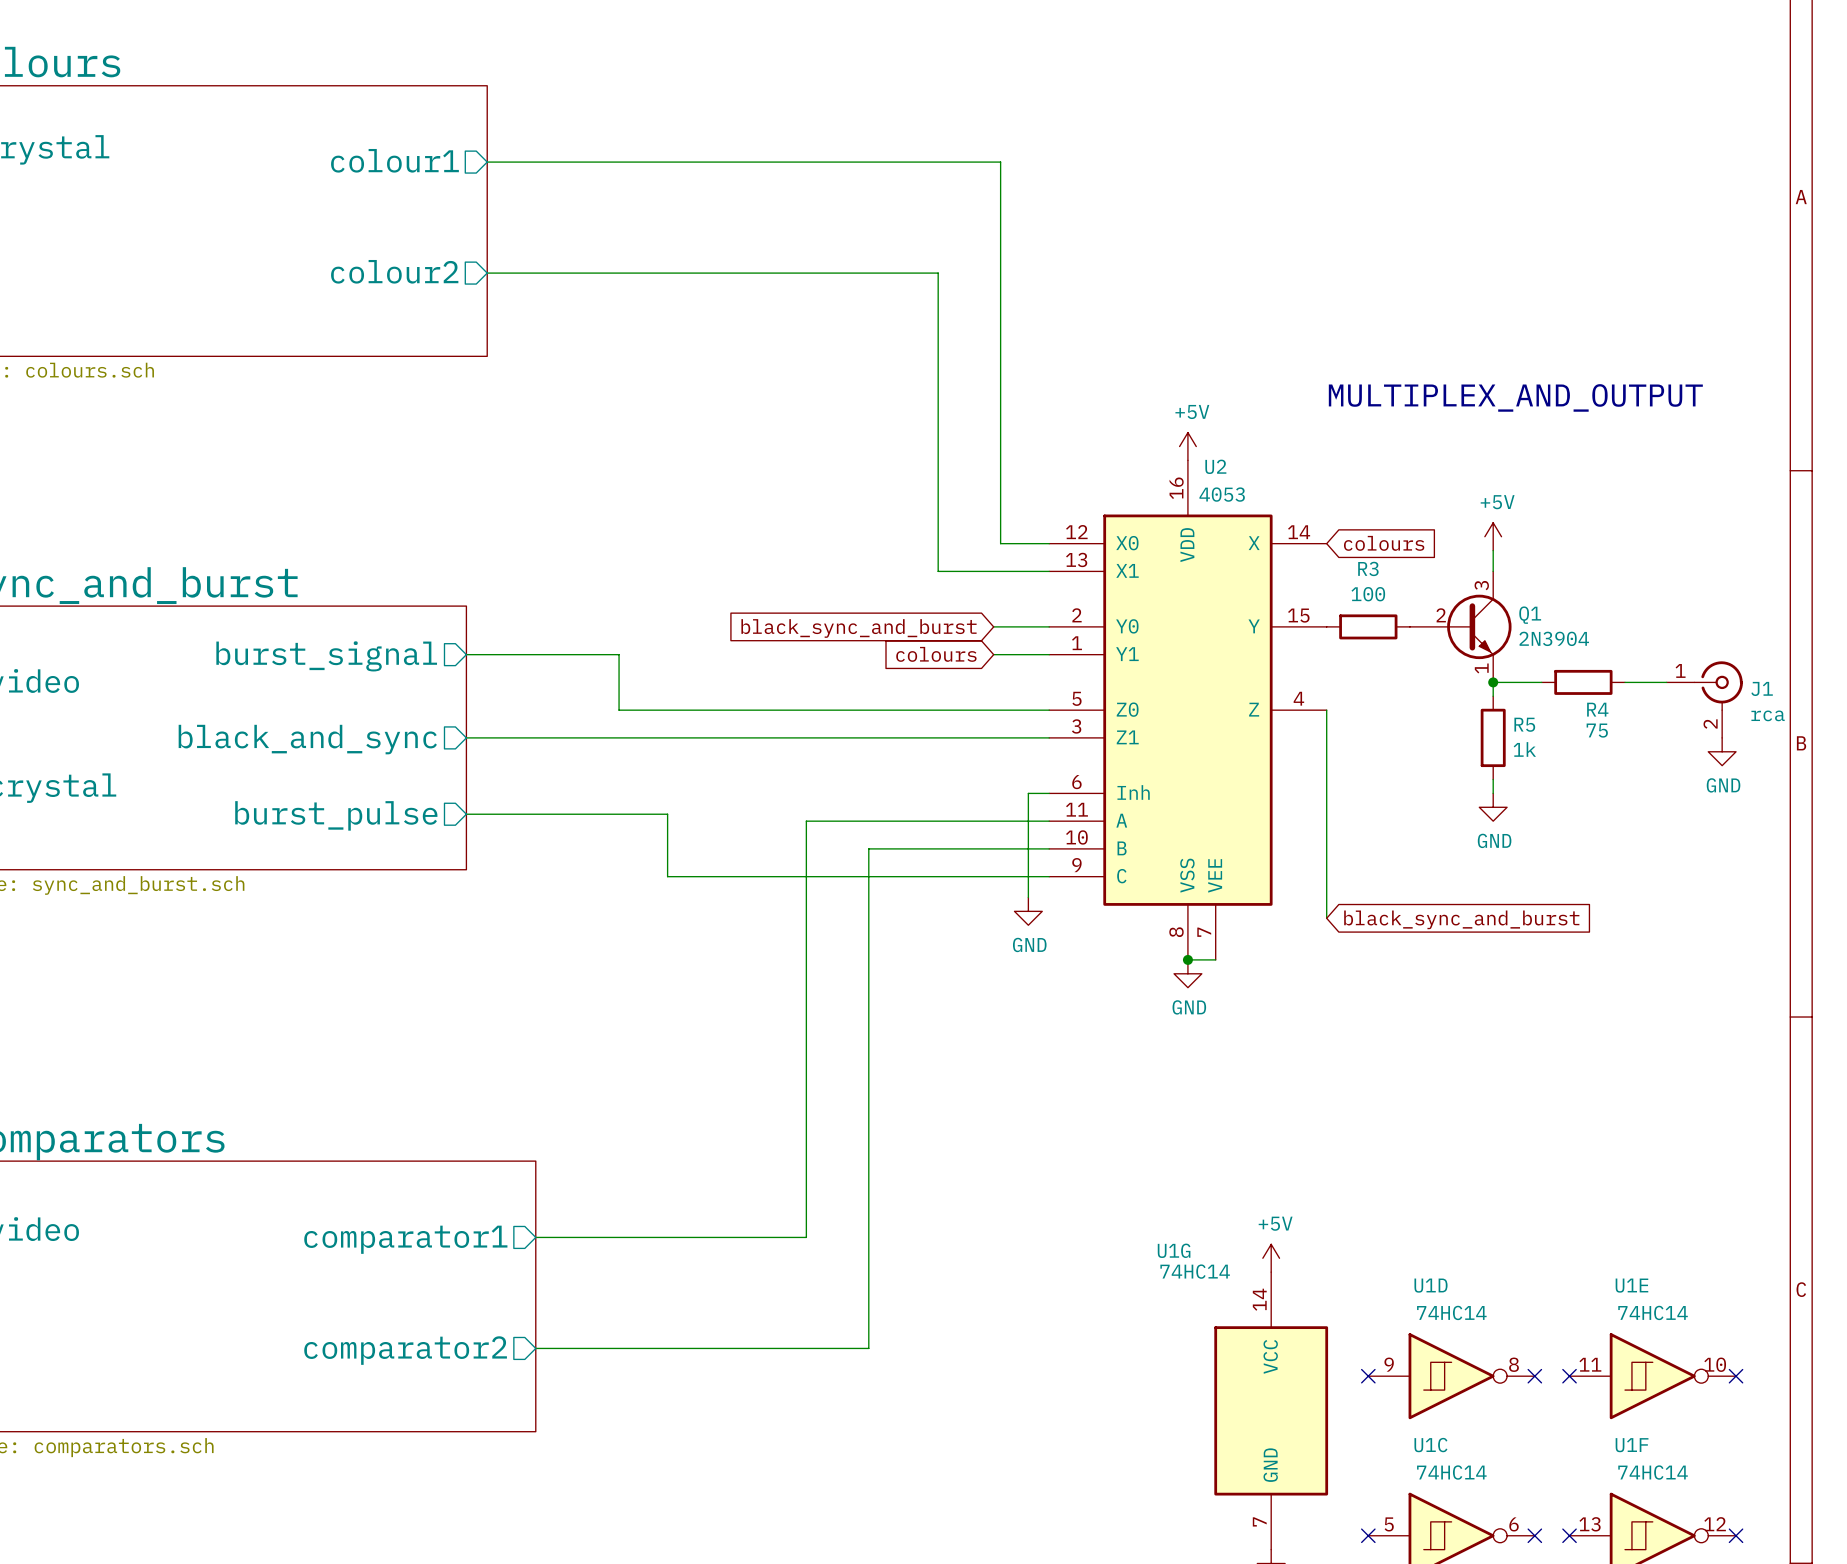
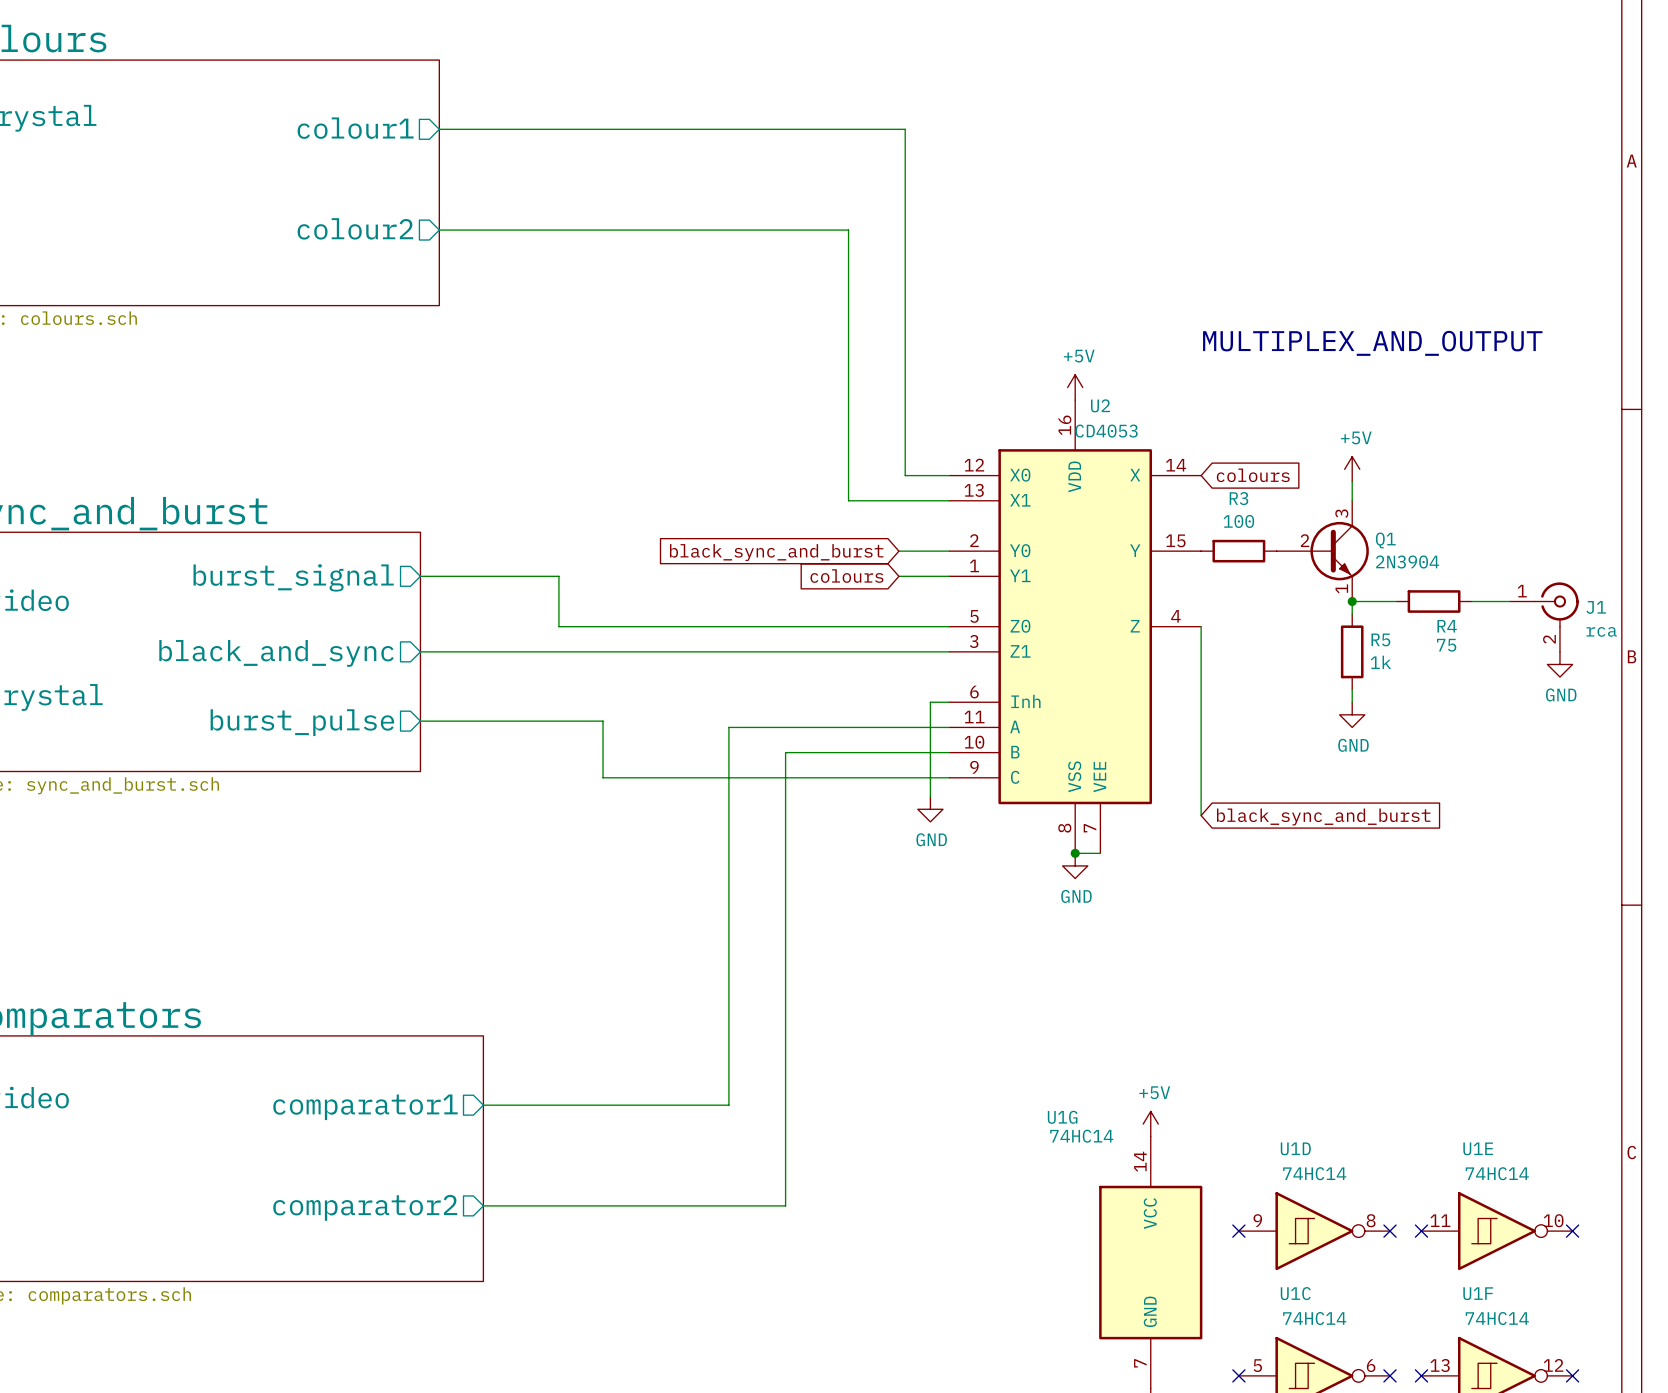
U2 value: 4053 (1222, 494) -> CD4053 (1106, 431)

